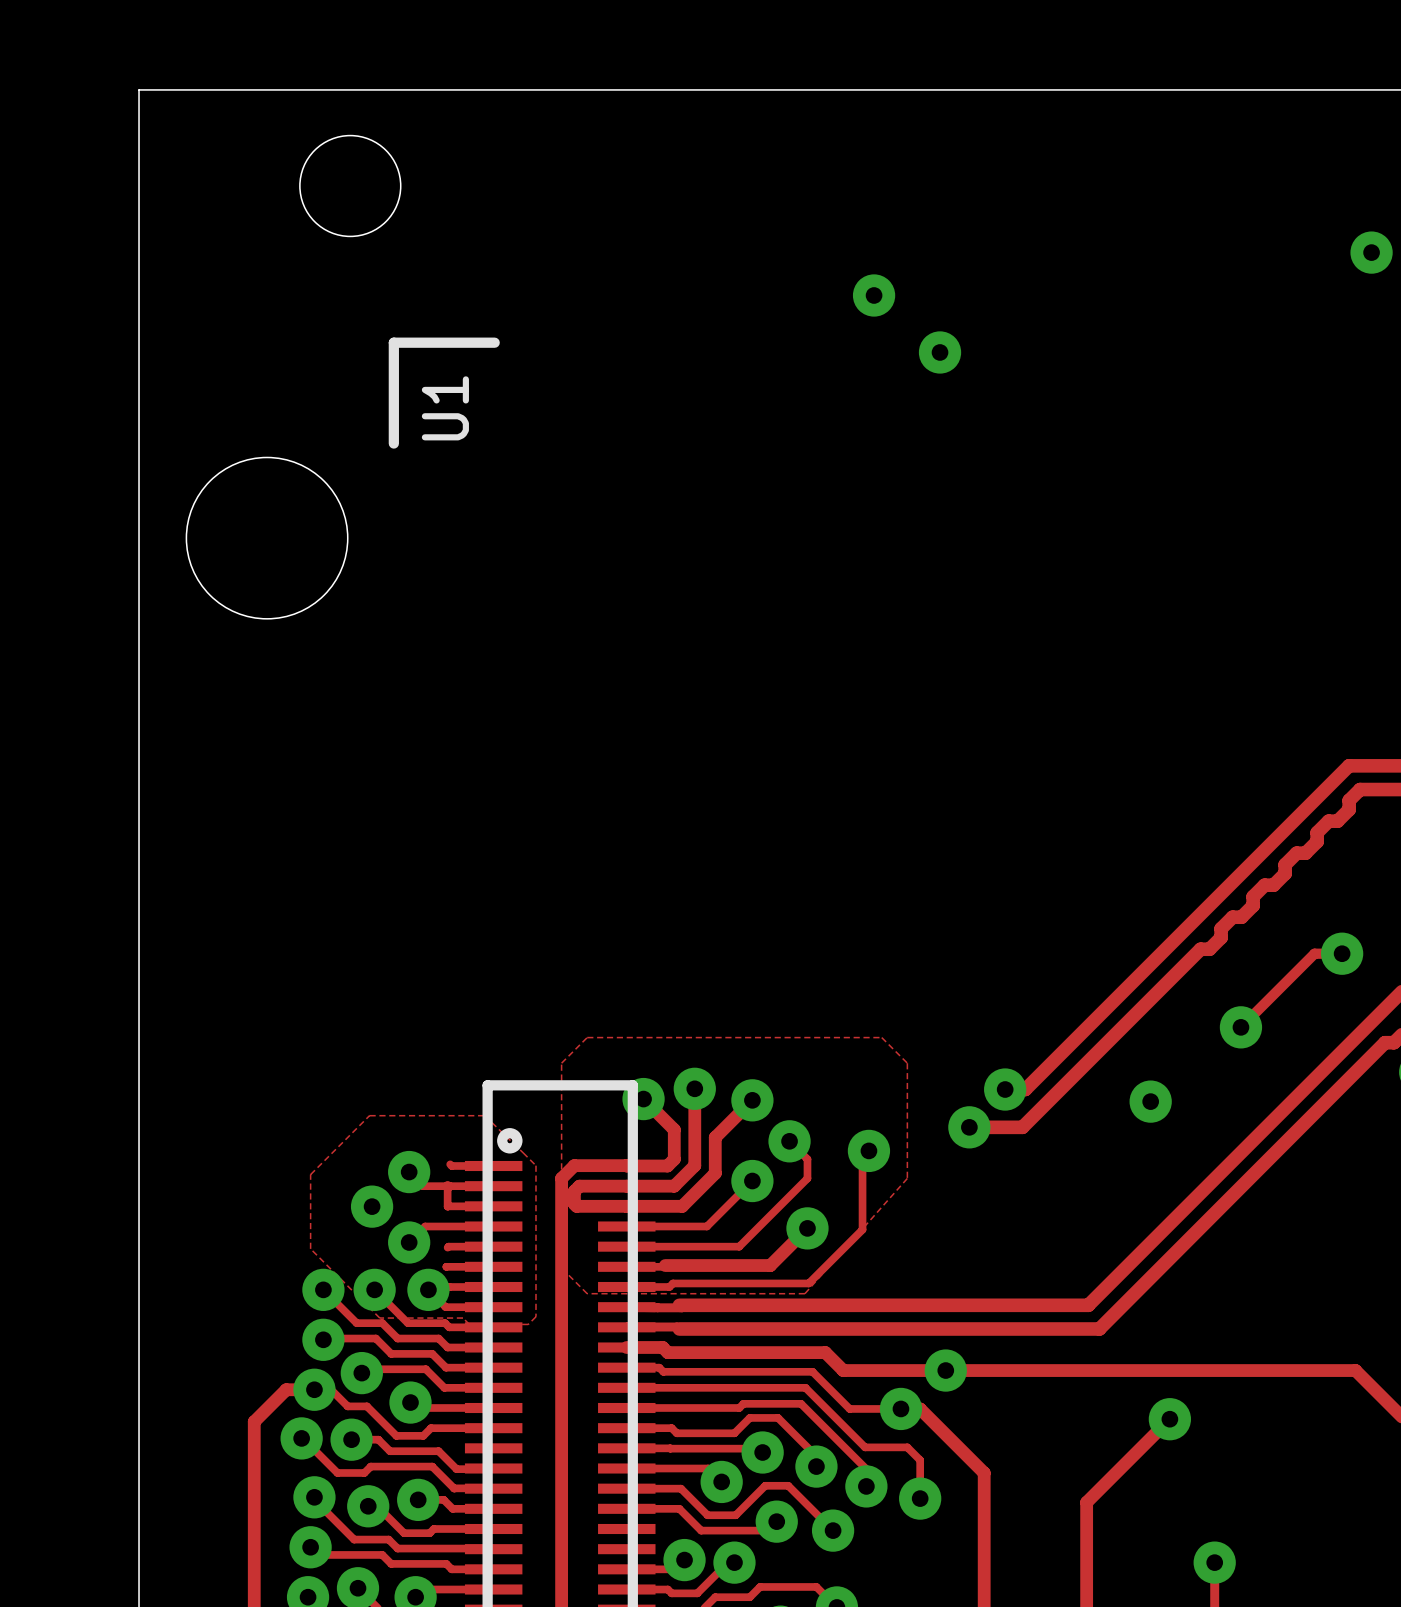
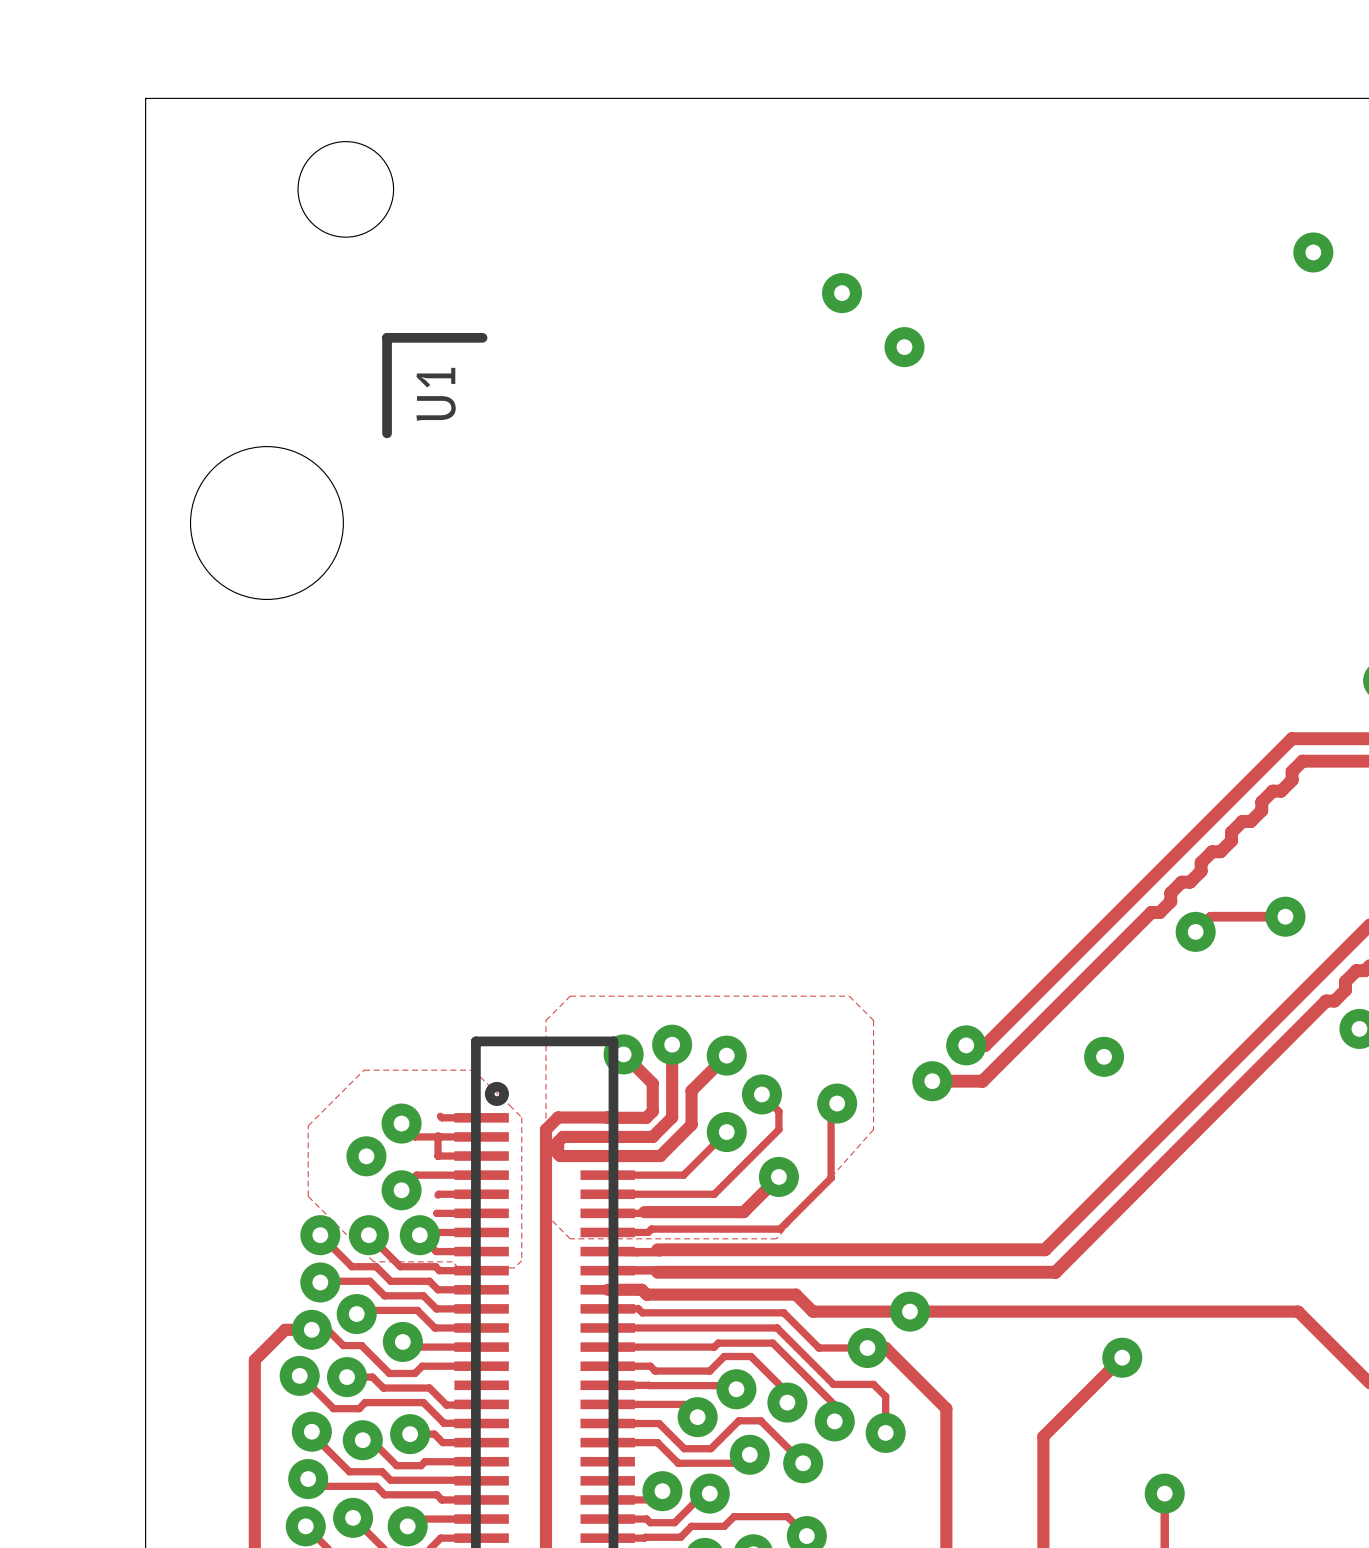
track: (1314, 953) (1240, 1027) -> (1259, 916) (1210, 916) (1195, 931)
via position: (1240, 1027) -> (1195, 931)

